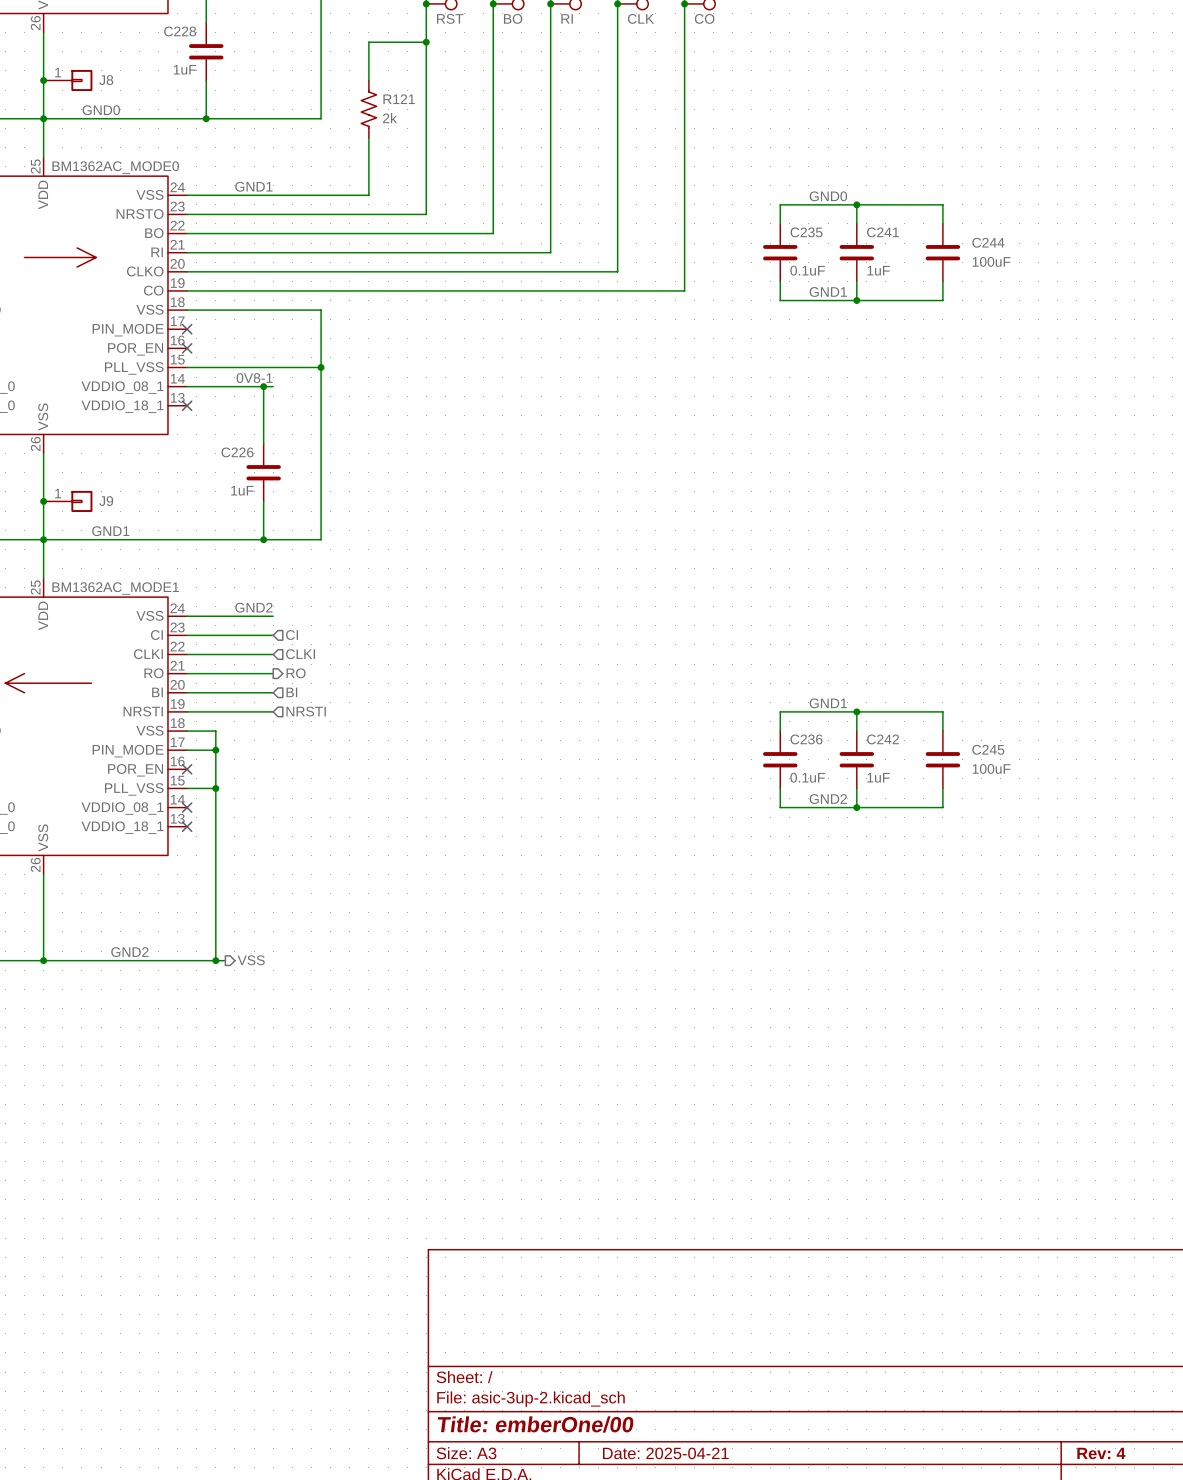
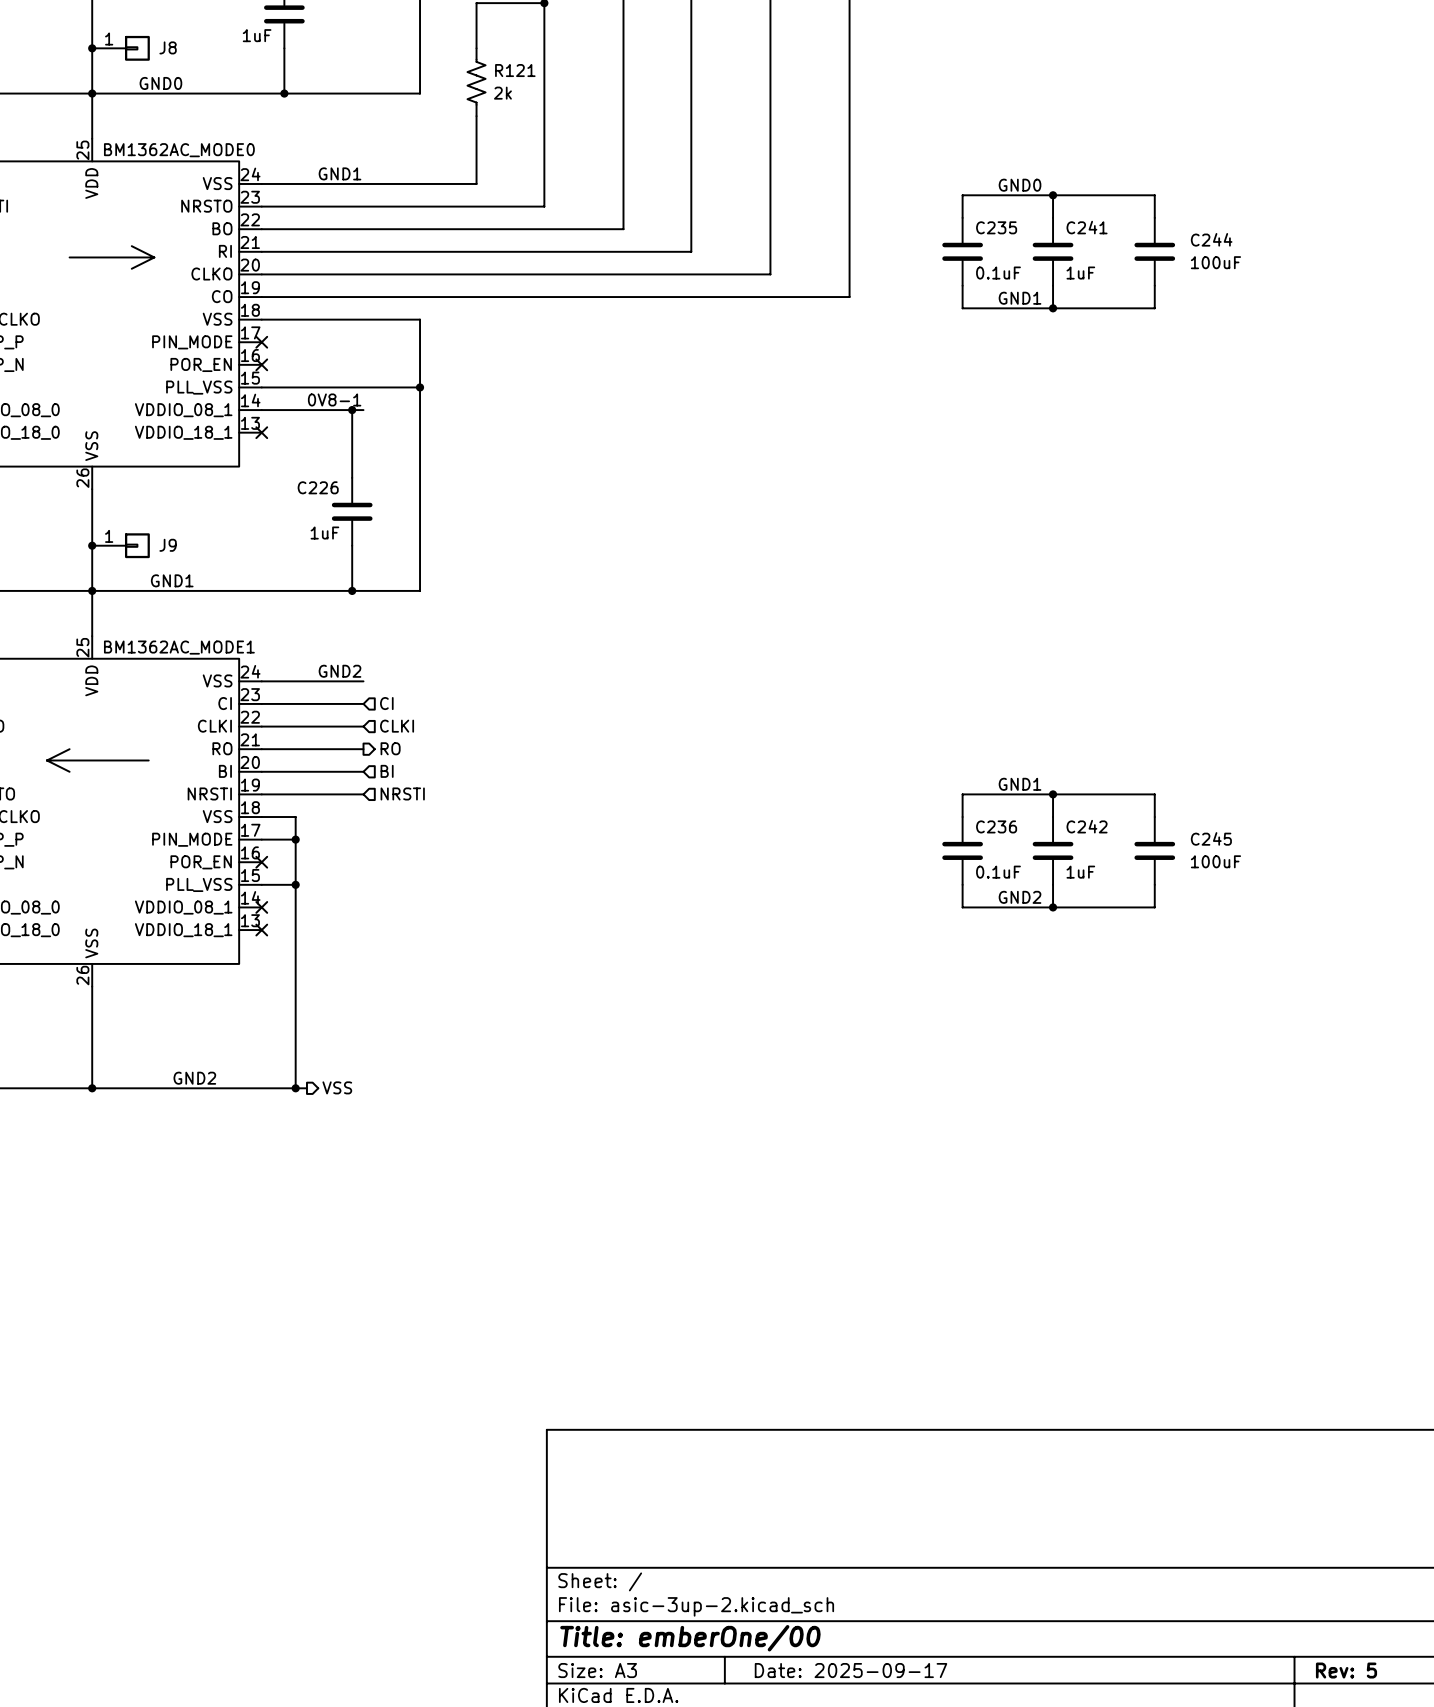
title block: Date: 2025-04-21 (665, 1453) -> Date: 2025-09-17 (851, 1670)
title block: Rev: 4 (1101, 1453) -> Rev: 5 (1346, 1670)

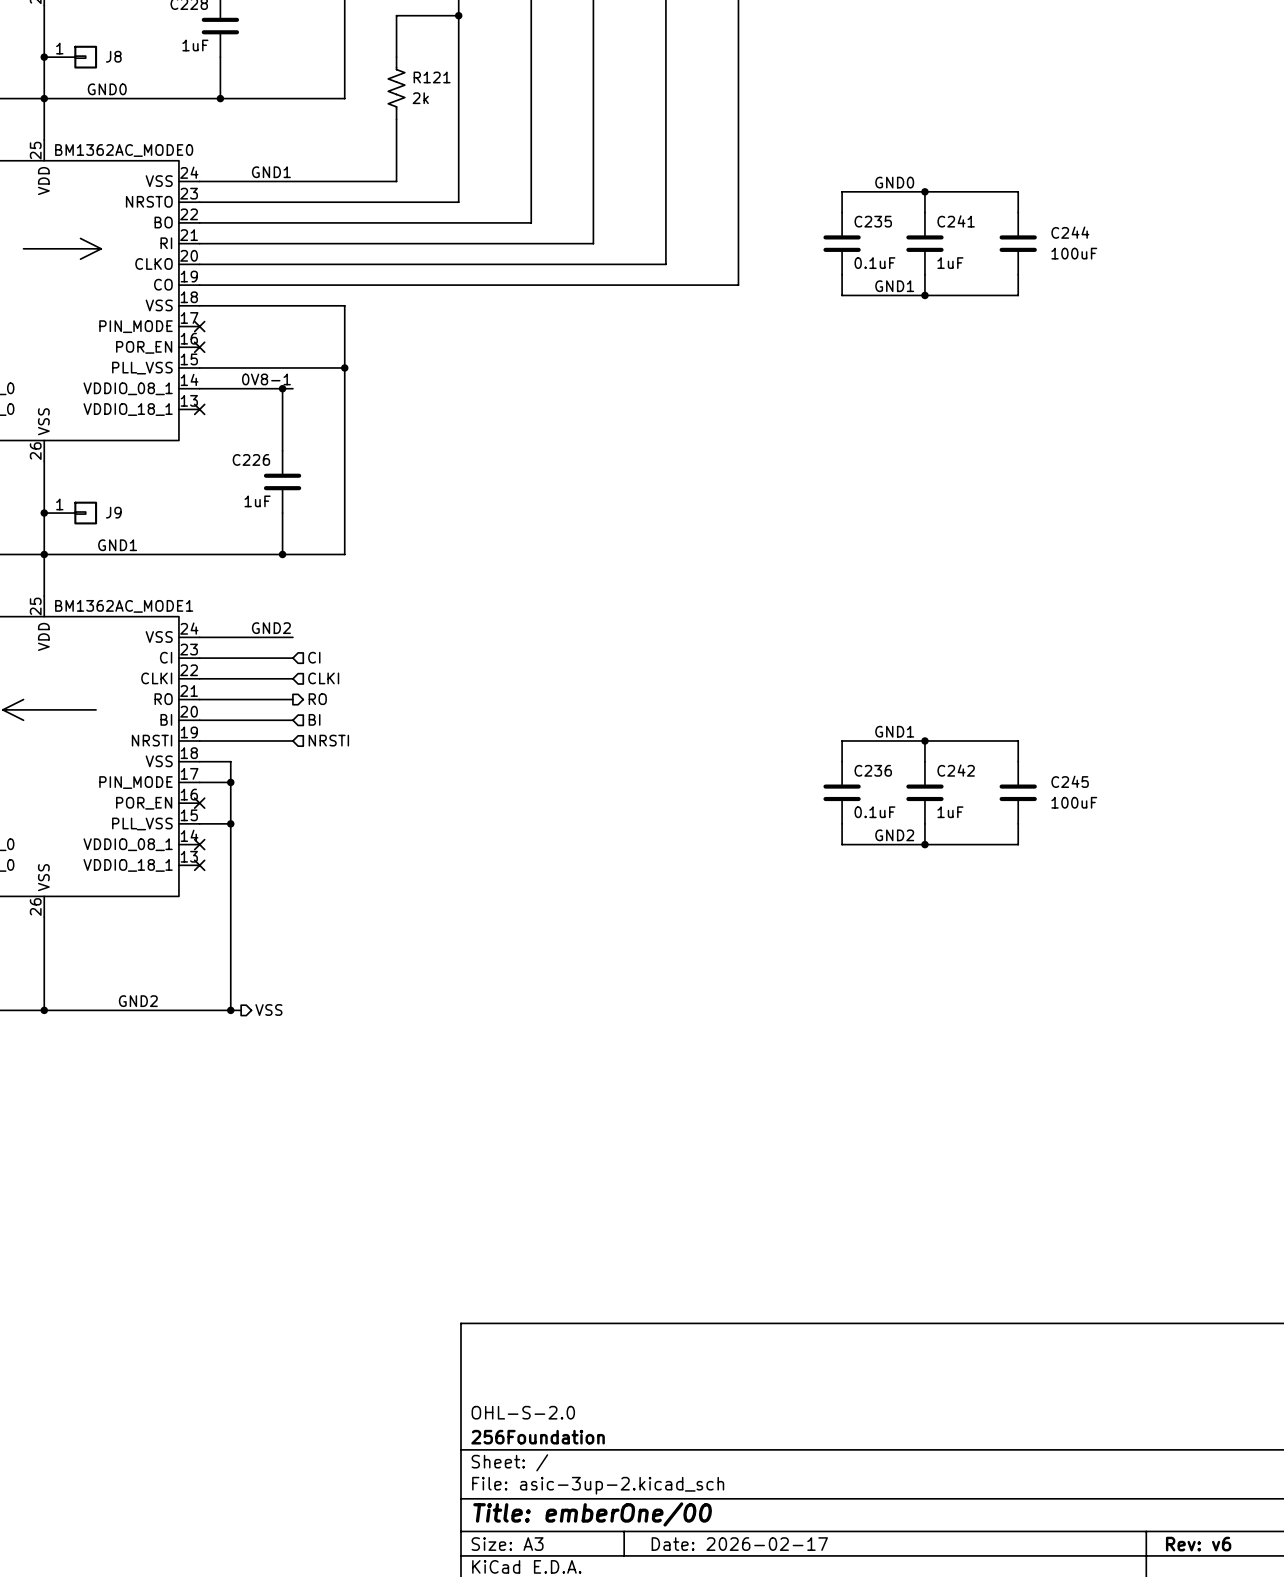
title block: none -> OHL-S-2.0 (523, 1412)
title block: none -> 256Foundation (538, 1437)
title block: Date: 2025-09-17 (851, 1670) -> Date: 2026-02-17 (739, 1544)
title block: Rev: 5 (1346, 1670) -> Rev: v6 (1198, 1544)

